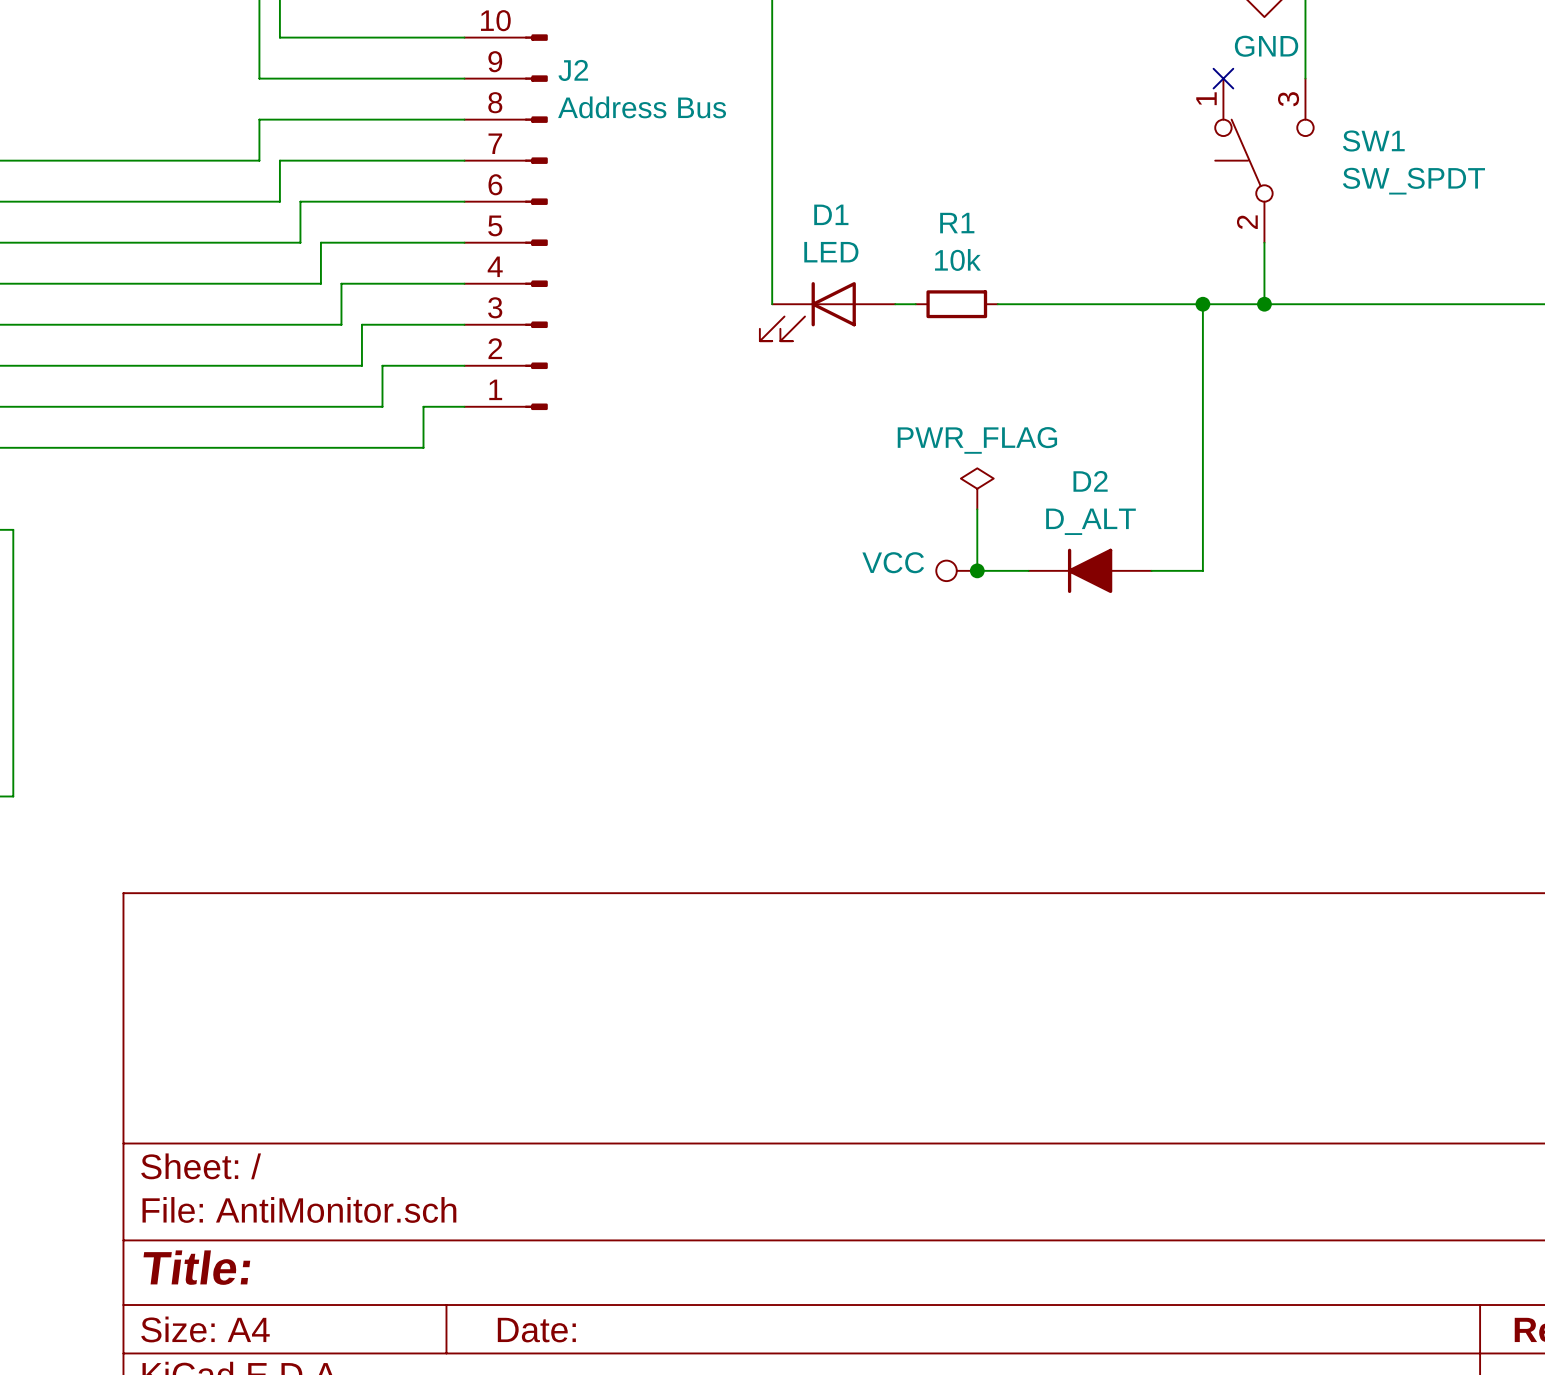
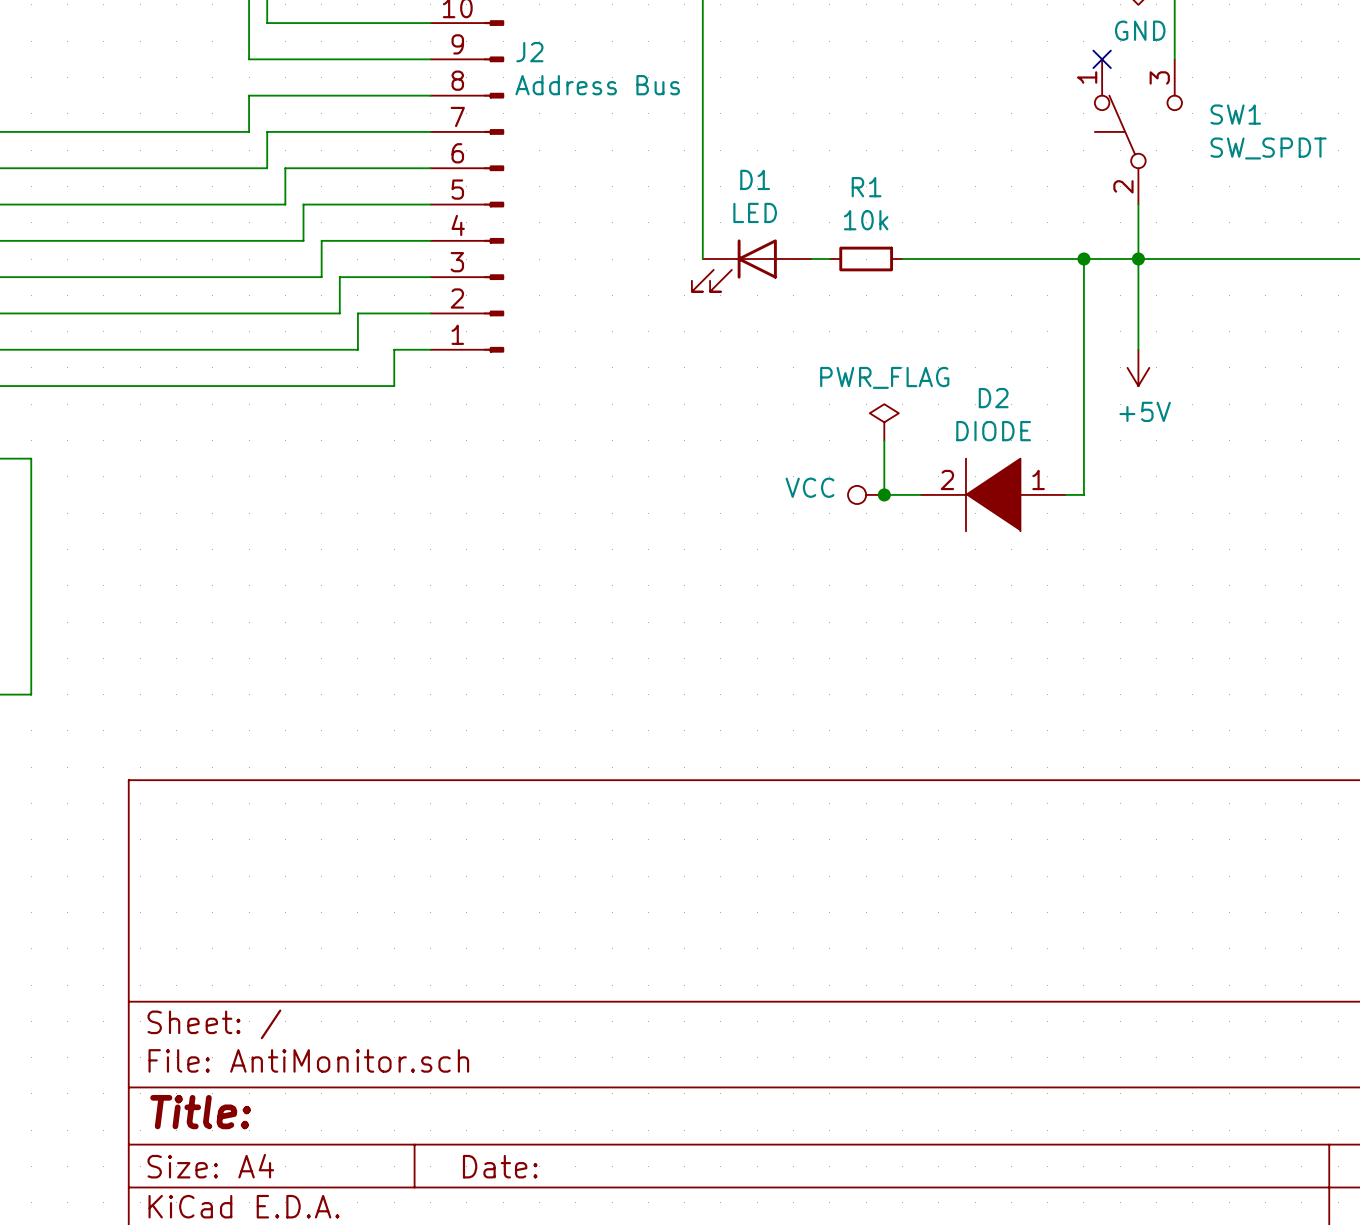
wire: none -> (1138, 259) (1138, 349)
power symbol: none -> +5V (1138, 367)
D2 value: D_ALT (1090, 521) -> DIODE (993, 431)
D2 symbol: [1028, 548, 1152, 594] -> [920, 458, 1066, 532]

